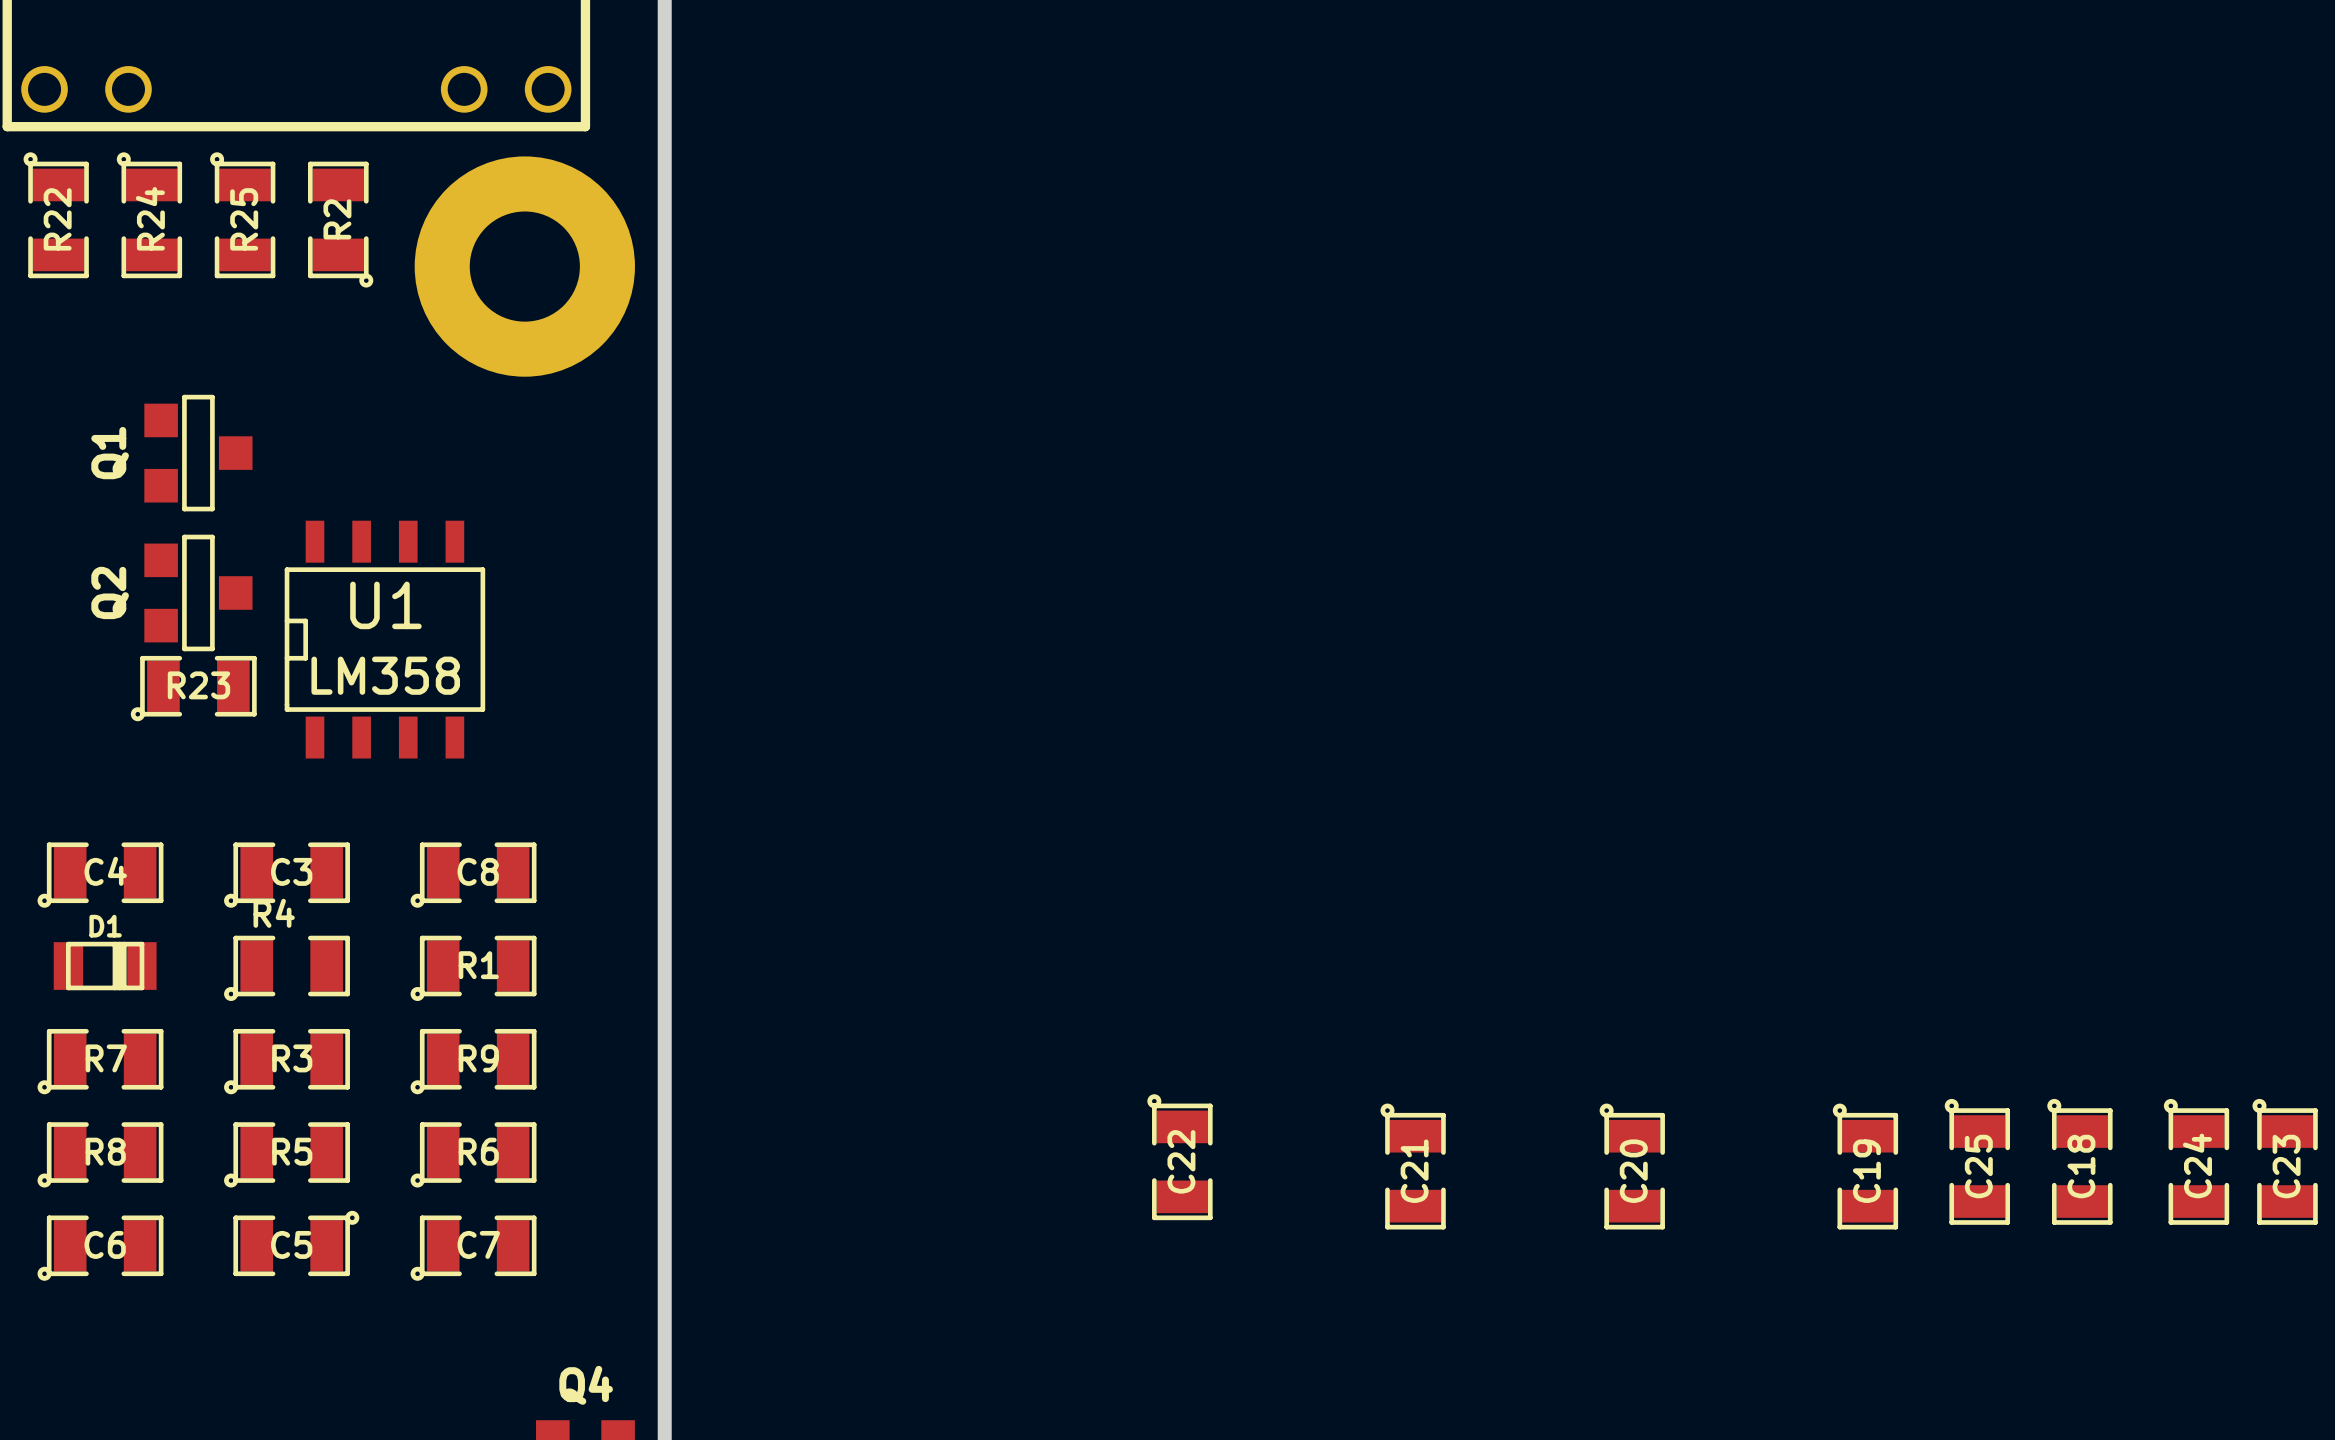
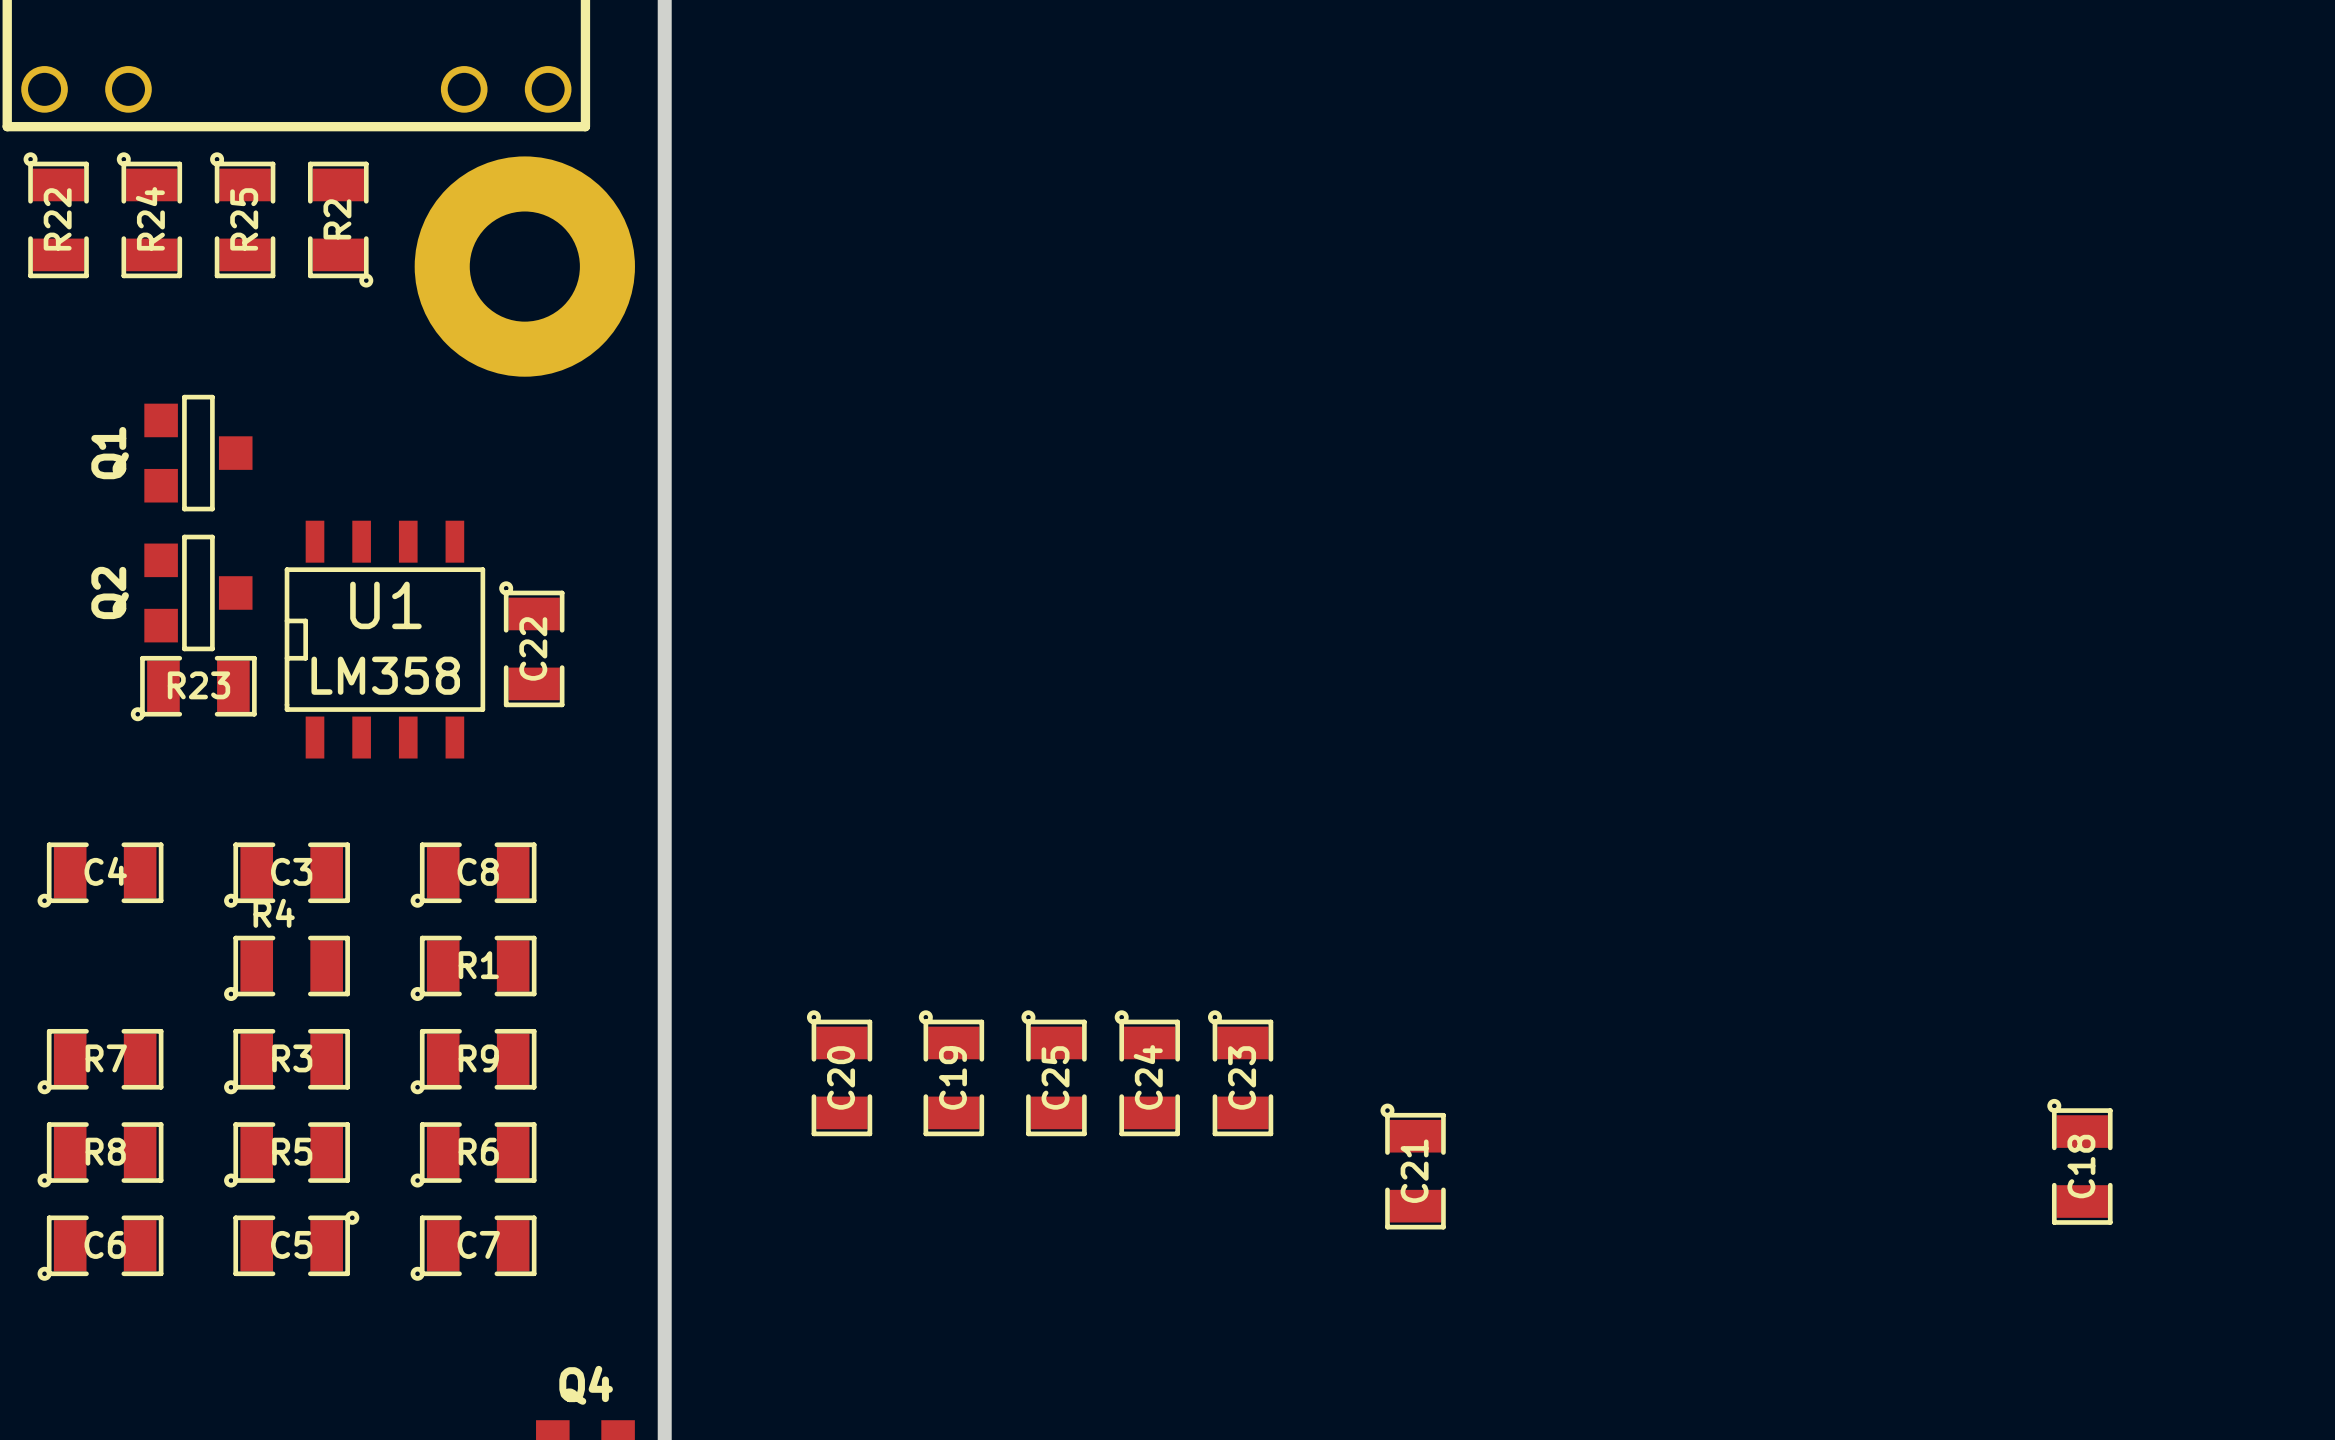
D1: (105, 966) -> none
C22 position: (1179, 1157) -> (531, 644)
C25 position: (1977, 1161) -> (1054, 1073)
C24 position: (2196, 1161) -> (1147, 1073)
C23 position: (2285, 1161) -> (1240, 1073)
C20 position: (1632, 1166) -> (839, 1073)
C19 position: (1865, 1166) -> (951, 1073)

